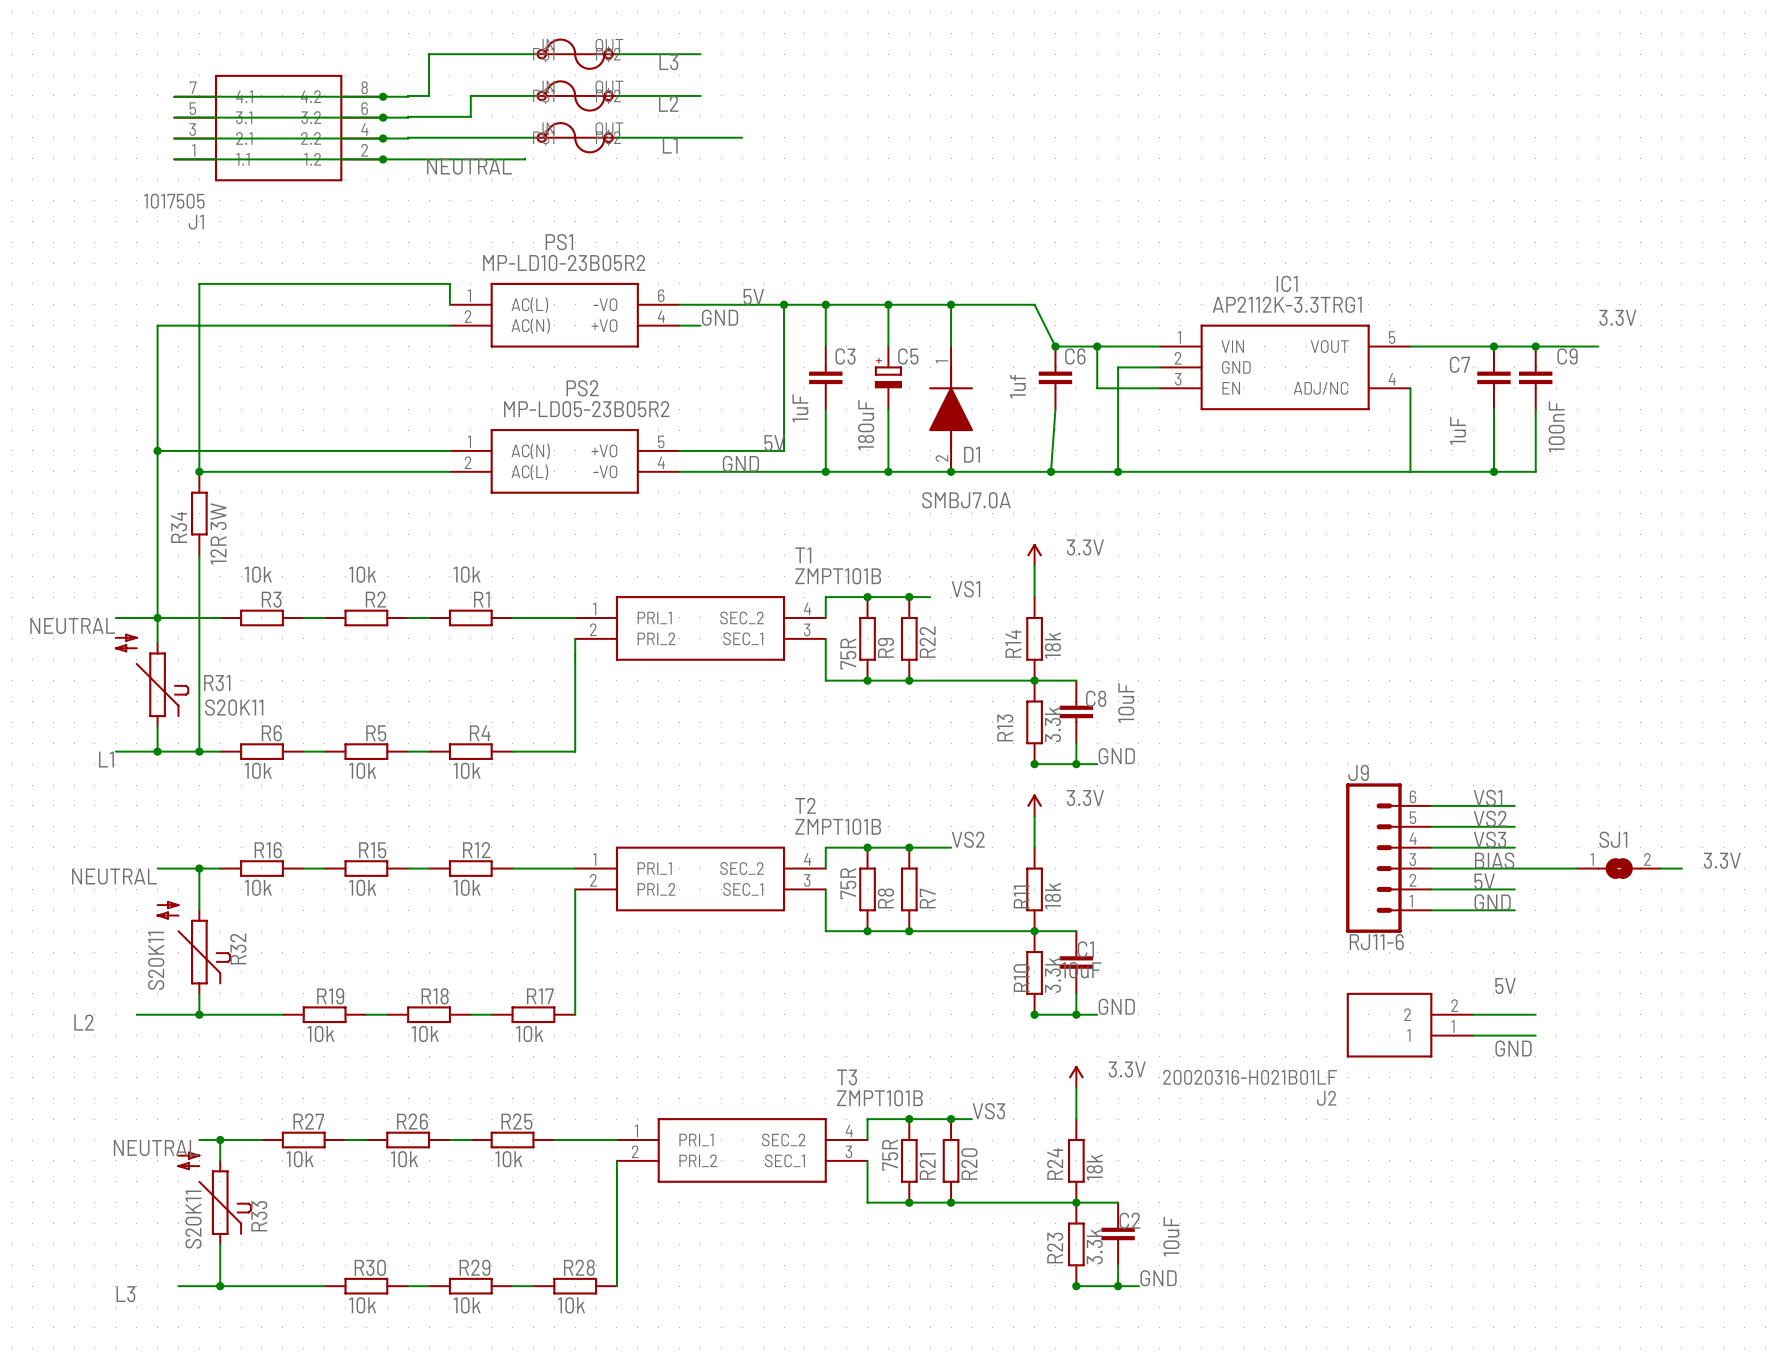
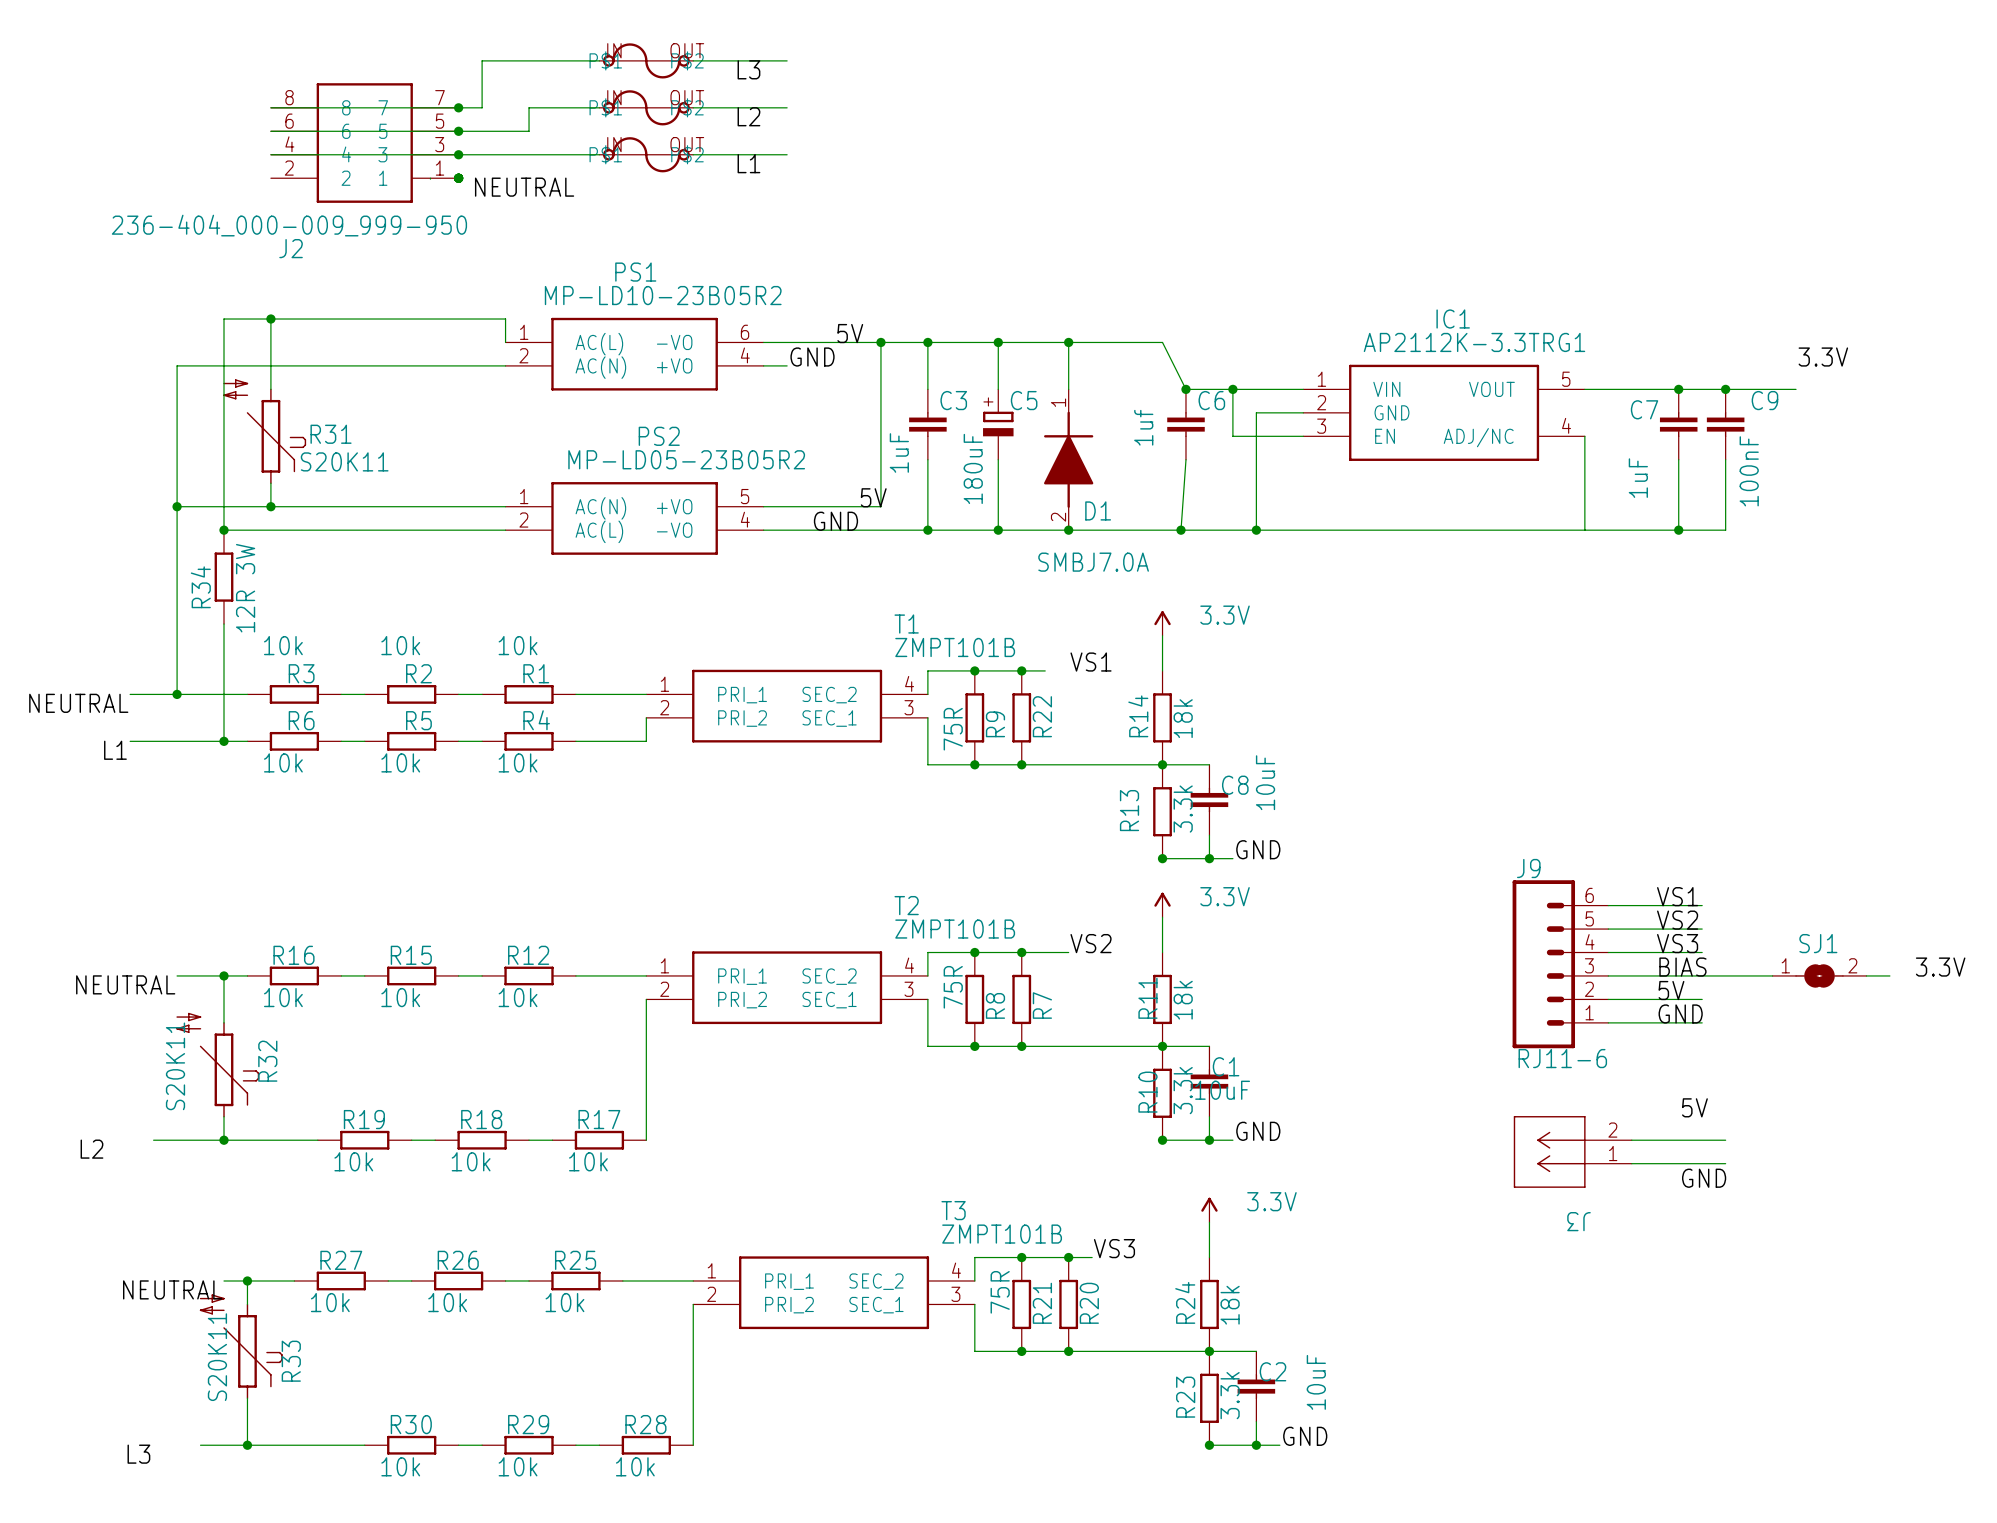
wire: (408, 95) (174, 96) -> (458, 107) (270, 107)
junction: none -> (458, 107)
junction: (383, 96) -> none
wire: (408, 116) (174, 117) -> (458, 131) (270, 131)
junction: none -> (458, 131)
junction: (383, 117) -> none
J1: 1017505 (278, 128) -> none
wire: (408, 137) (174, 138) -> (458, 154) (270, 154)
junction: none -> (458, 154)
wire: (700, 137) (742, 137) -> none
junction: (383, 138) -> none
junction: none -> (458, 178)
wire: (525, 158) (174, 159) -> none
junction: (383, 159) -> none
wire: none -> (270, 319) (270, 389)
junction: none -> (270, 319)
wire: none -> (270, 483) (270, 506)
junction: none -> (270, 506)
wire: (157, 617) (157, 643) -> none
wire: (199, 659) (199, 751) -> none
junction: none -> (224, 741)
wire: (575, 659) (575, 751) (512, 751) -> (646, 741) (575, 741)
R31 position: (152, 680) -> (264, 431)
wire: (157, 726) (157, 751) -> none
wire: (115, 751) (220, 751) -> (130, 741) (247, 741)
junction: (157, 751) -> none
junction: (199, 751) -> none
R6 position: (261, 751) -> (294, 741)
wire: (303, 751) (324, 751) -> (341, 741) (364, 741)
R5 position: (366, 751) -> (411, 741)
wire: (408, 751) (429, 751) -> (458, 741) (482, 741)
R4 position: (470, 751) -> (529, 741)
label position: L1 (106, 759) -> L1 (115, 750)
J2 symbol: [1346, 992, 1474, 1058] -> [270, 83, 459, 203]
J3: none -> (1572, 1151)
J2 value: 20020316-H021B01LF (1250, 1077) -> 236-404_000-009_999-950 (289, 225)
J2 name position: J2 (1326, 1098) -> J2 (291, 248)

